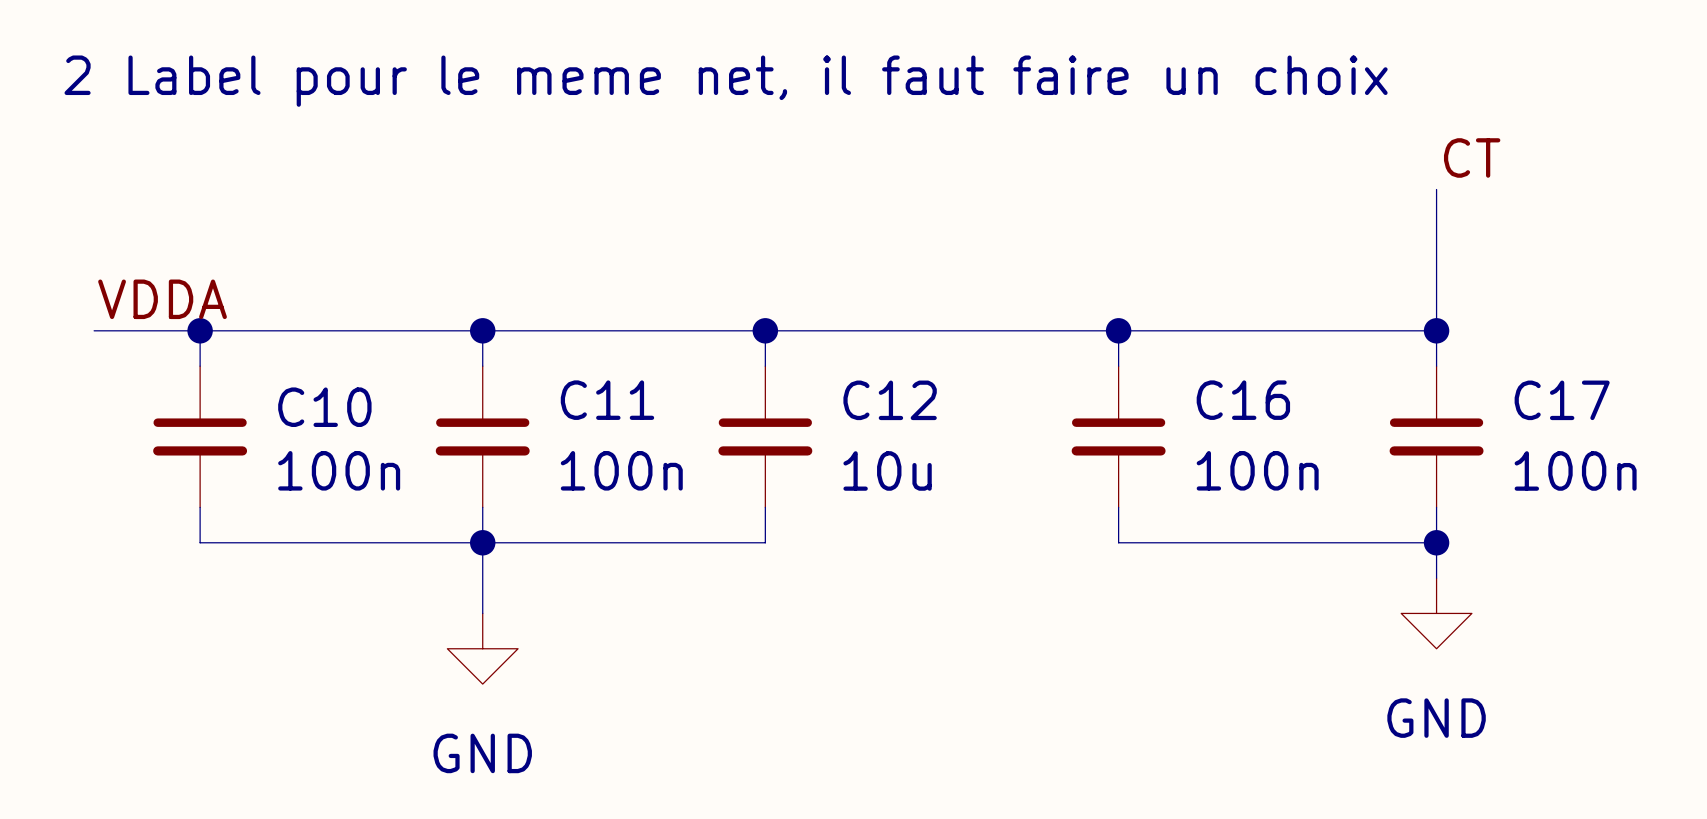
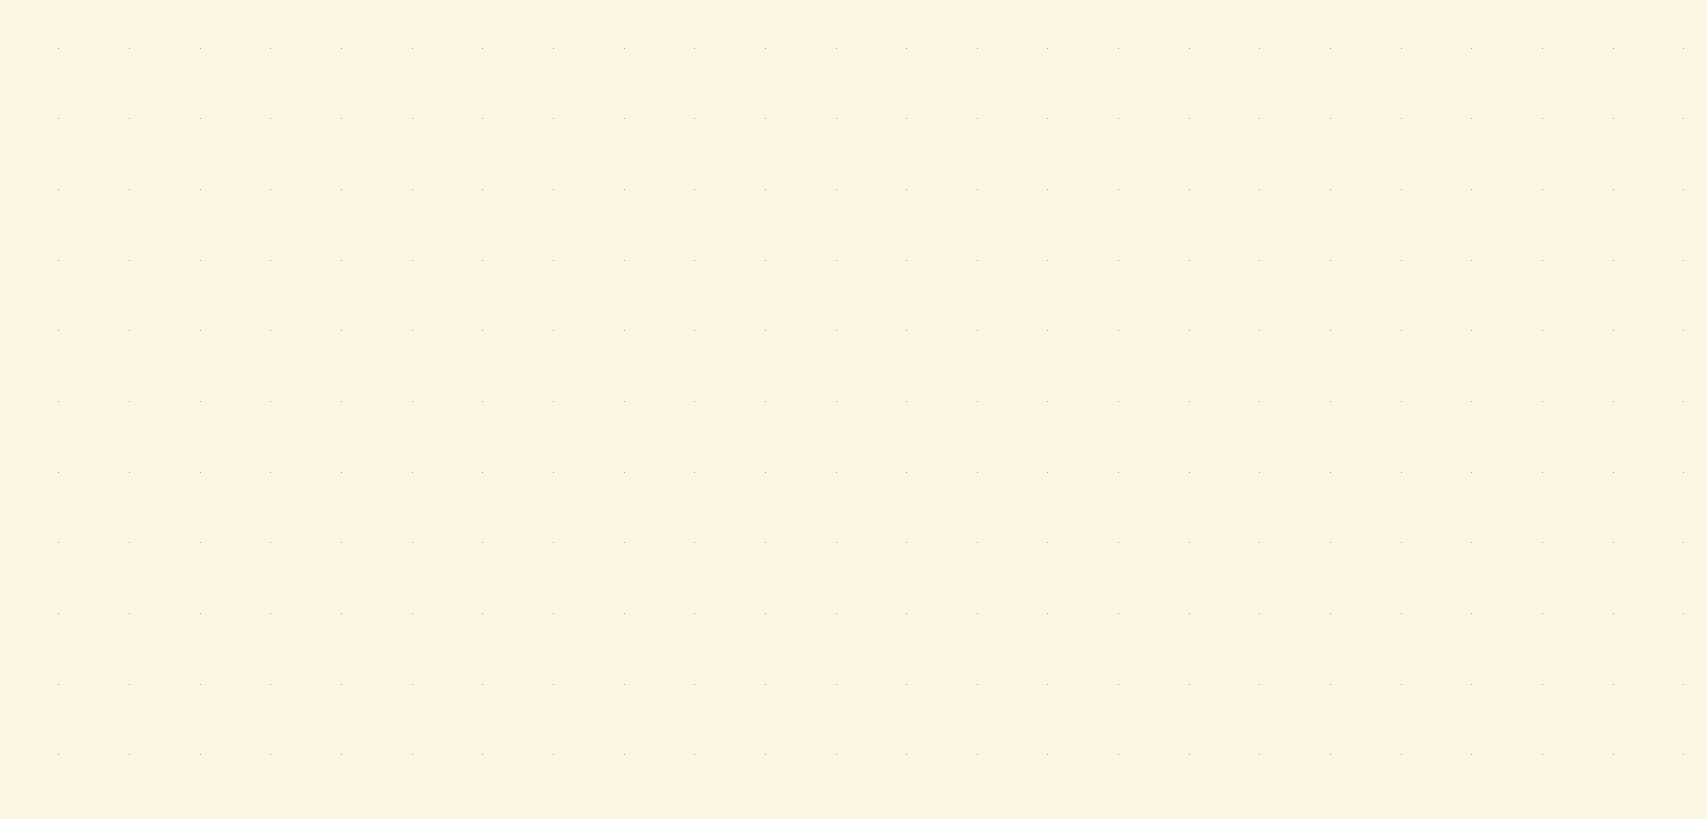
text: 2 Label pour le meme net, il faut faire un choix (726, 81) -> none
label: CT (1472, 157) -> none
wire: (1436, 189) (1436, 366) -> none
label: VDDA (162, 299) -> none
wire: (94, 330) (1436, 330) -> none
wire: (200, 330) (200, 366) -> none
junction: (200, 330) -> none
wire: (482, 330) (482, 366) -> none
junction: (482, 330) -> none
wire: (765, 330) (765, 366) -> none
junction: (765, 330) -> none
wire: (1118, 330) (1118, 366) -> none
junction: (1118, 330) -> none
junction: (1436, 330) -> none
C10: 100n (200, 436) -> none
C11: 100n (482, 436) -> none
C12: 10u (765, 436) -> none
C16: 100n (1118, 436) -> none
C17: 100n (1436, 436) -> none
wire: (200, 507) (200, 542) (765, 542) (765, 507) -> none
wire: (482, 507) (482, 613) -> none
wire: (1118, 507) (1118, 542) (1436, 542) -> none
wire: (1436, 507) (1436, 578) -> none
junction: (482, 542) -> none
junction: (1436, 542) -> none
power symbol: GND (1436, 613) -> none
power symbol: GND (482, 648) -> none

